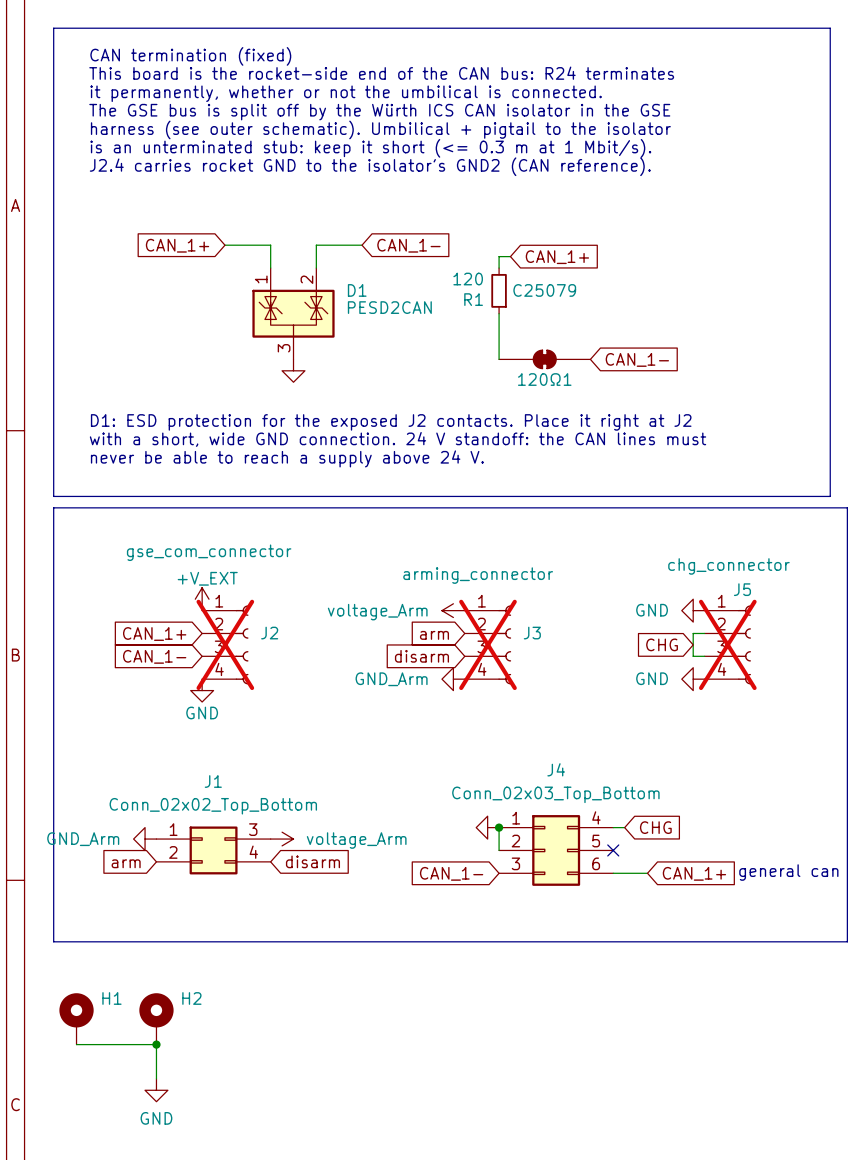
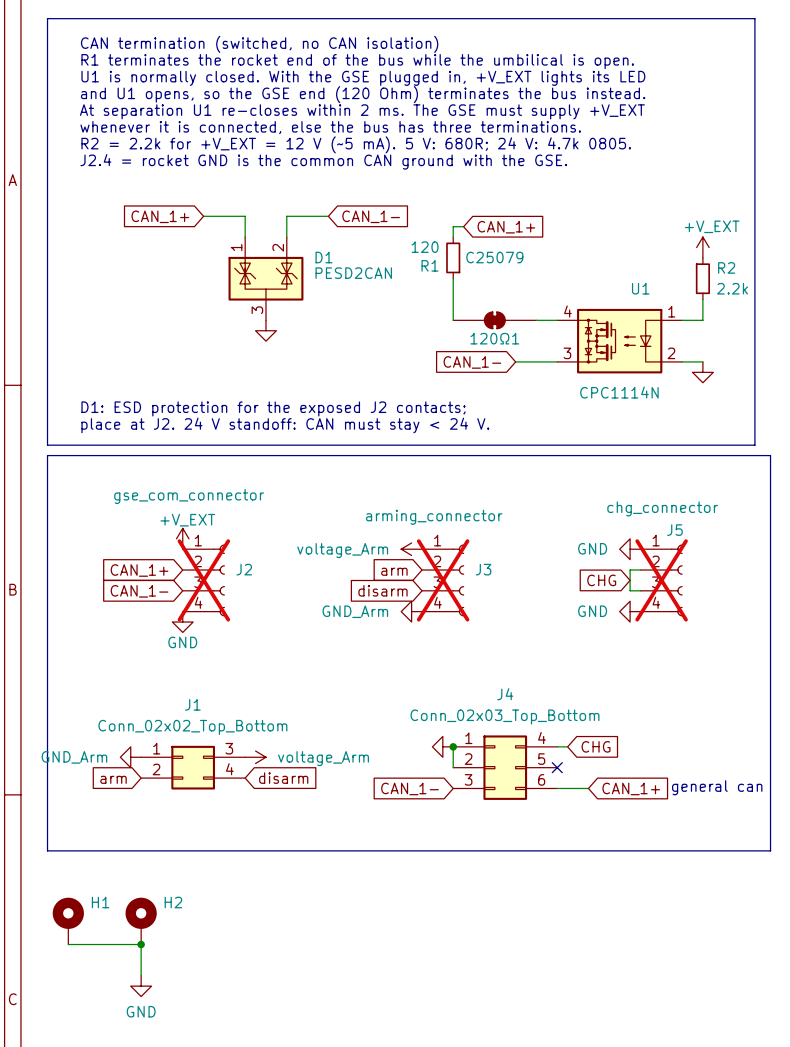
text: CAN termination (fixed) (190, 56) -> CAN termination (switched, no CAN isolation) (259, 44)
text: This board is the rocket-side end of the CAN bus: R24 terminates (381, 73) -> R1 terminates the rocket end of the bus while the umbilical is open. (357, 61)
text: it permanently, whether or not the umbilical is connected. (346, 93) -> U1 is normally closed. With the GSE plugged in, +V_EXT lights its LED (363, 78)
text: The GSE bus is split off by the Würth ICS CAN isolator in the GSE (379, 112) -> and U1 opens, so the GSE end (120 Ohm) terminates the bus instead. (363, 94)
text: harness (see outer schematic). Umbilical + pigtail to the isolator (380, 129) -> At separation U1 re-closes within 2 ms. The GSE must supply +V_EXT (362, 111)
text: is an unterminated stub: keep it short (<= 0.3 m at 1 Mbit/s). (370, 148) -> whenever it is connected, else the bus has three terminations. (330, 127)
text: J2.4 carries rocket GND to the isolator's GND2 (CAN reference). (370, 166) -> R2 = 2.2k for +V_EXT = 12 V (~5 mA). 5 V: 680R; 24 V: 4.7k 0805. (356, 144)
text: none -> J2.4 = rocket GND is the common CAN ground with the GSE. (323, 161)
power symbol: none -> +V_EXT (702, 247)
R2: none -> 2.2k (702, 278)
wire: none -> (702, 299) (702, 320) (682, 320)
wire: none -> (536, 320) (557, 320)
global label rotation: 0° (637, 359) -> 180° (472, 362)
global label position: CAN_1- (637, 359) -> CAN_1- (472, 362)
U1: none -> CPC1114N (619, 341)
wire: none -> (515, 361) (557, 361)
wire: none -> (682, 361) (702, 361)
power symbol: none -> (702, 372)
text: D1: ESD protection for the exposed J2 contacts. Place it right at J2 (391, 422) -> none
text: with a short, wide GND connection. 24 V standoff: the CAN lines must (398, 439) -> none
text: never be able to reach a supply above 24 V. (287, 458) -> D1: ESD protection for the exposed J2 contacts; (273, 408)
text: none -> place at J2. 24 V standoff: CAN must stay < 24 V. (285, 425)

